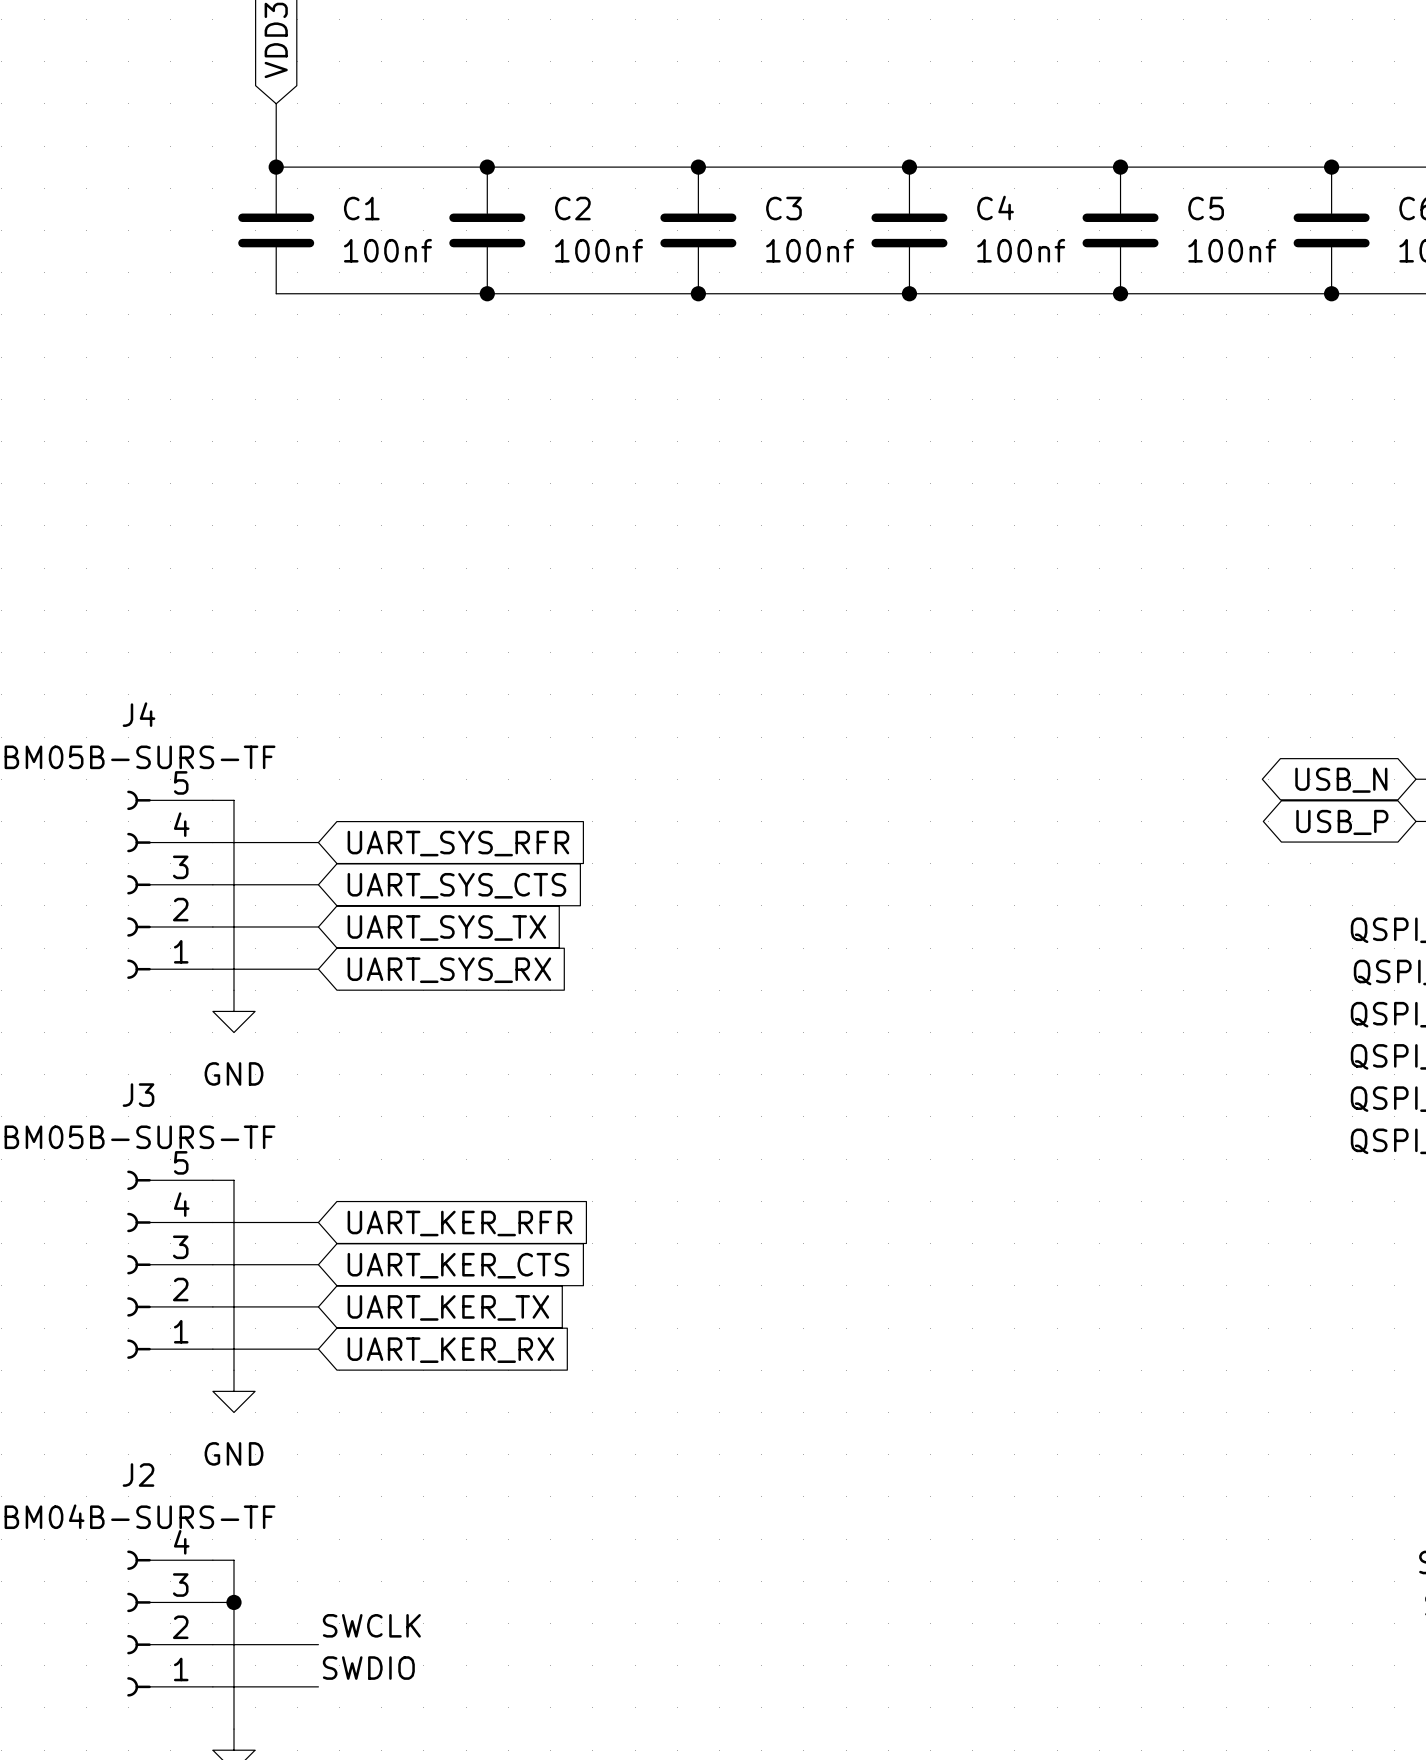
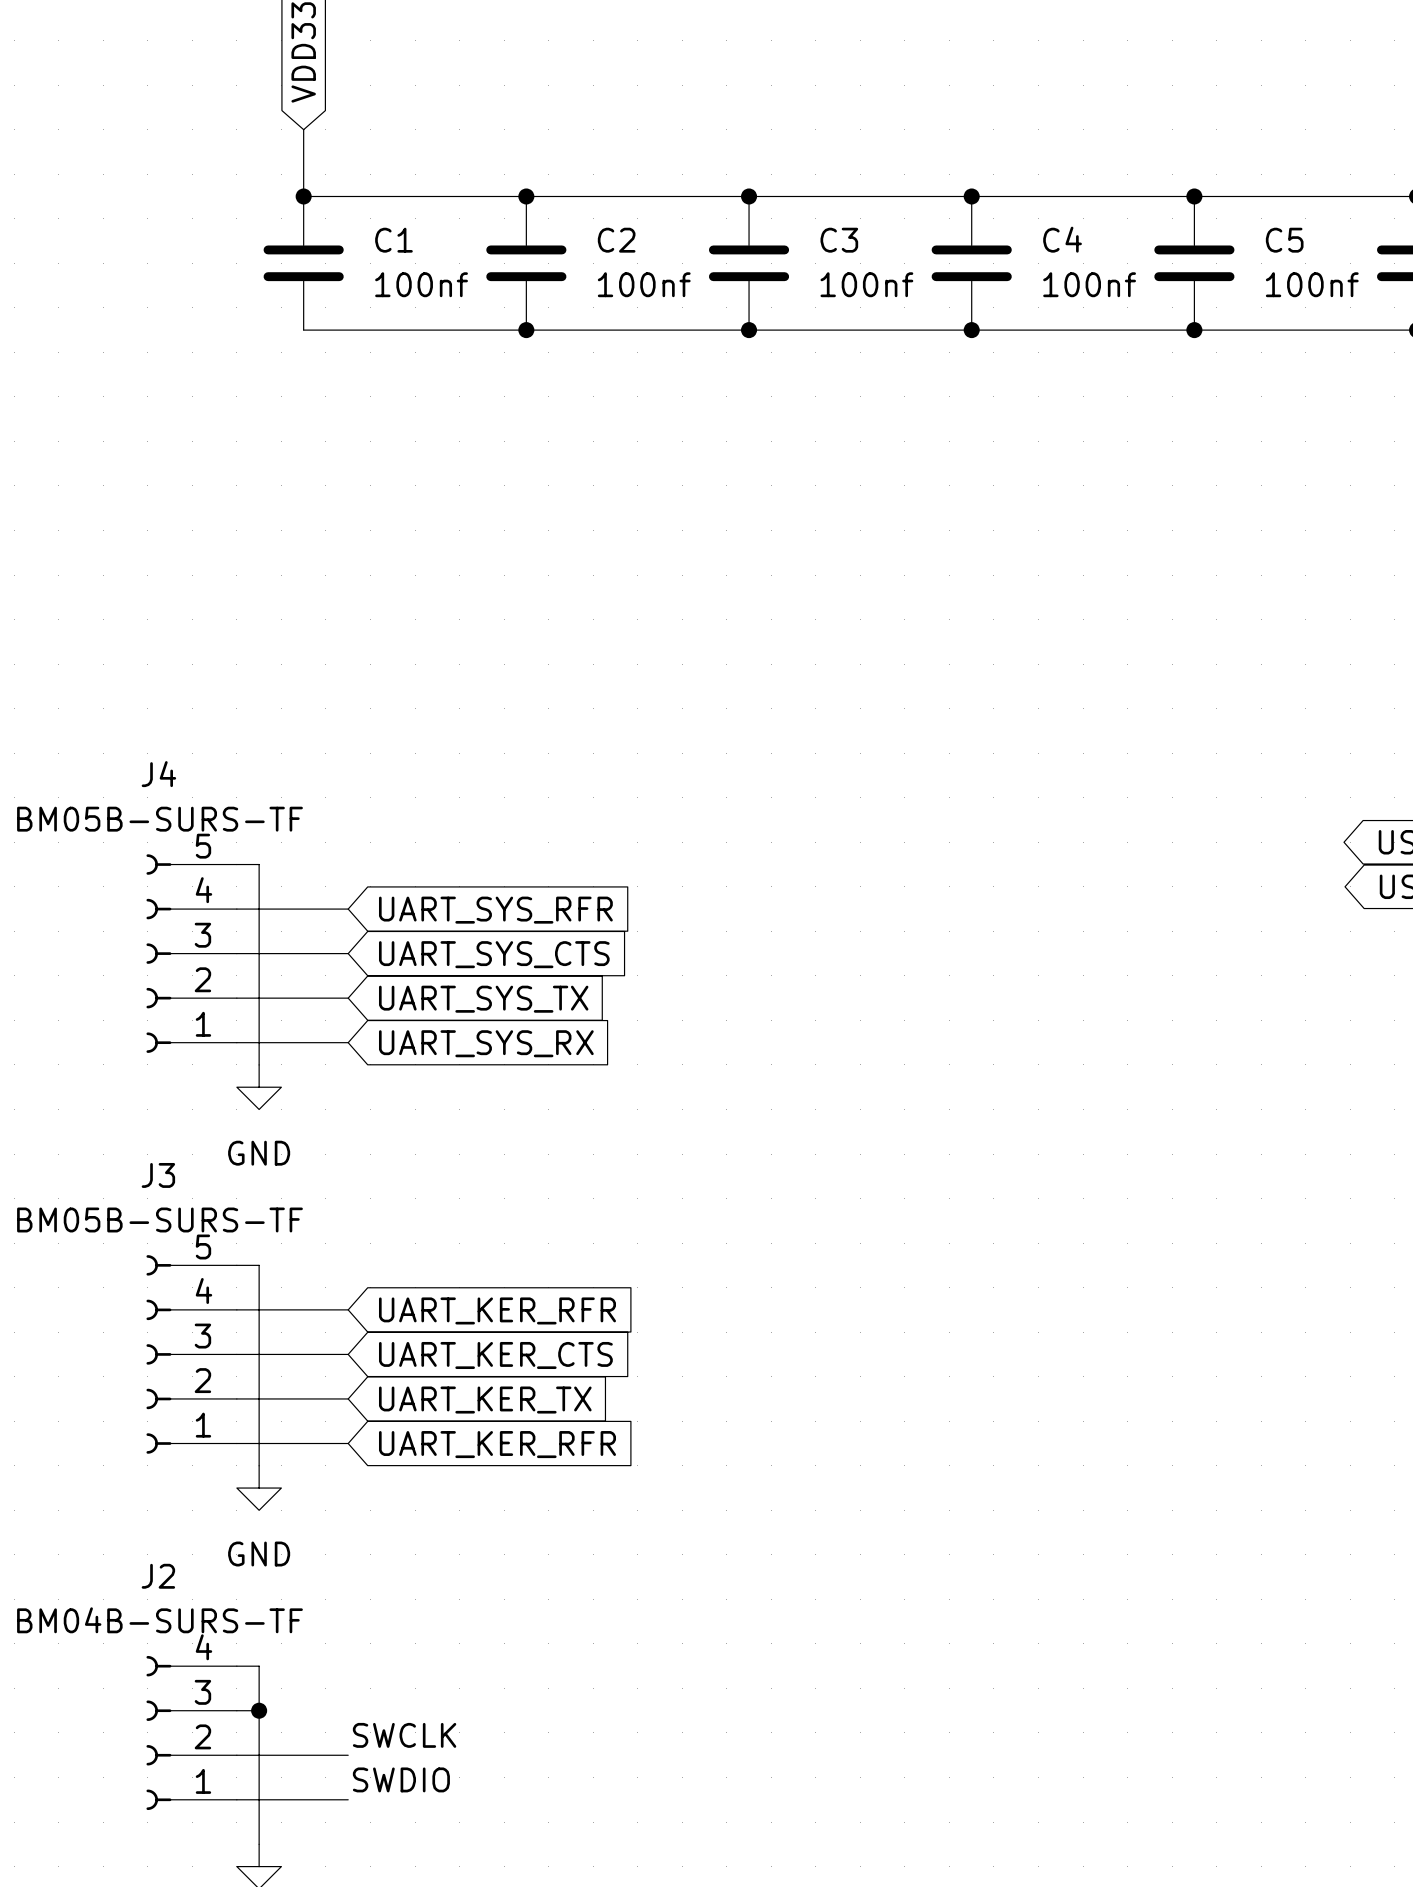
global label: UART_KER_RX (450, 1350) -> UART_KER_RFR (497, 1444)

